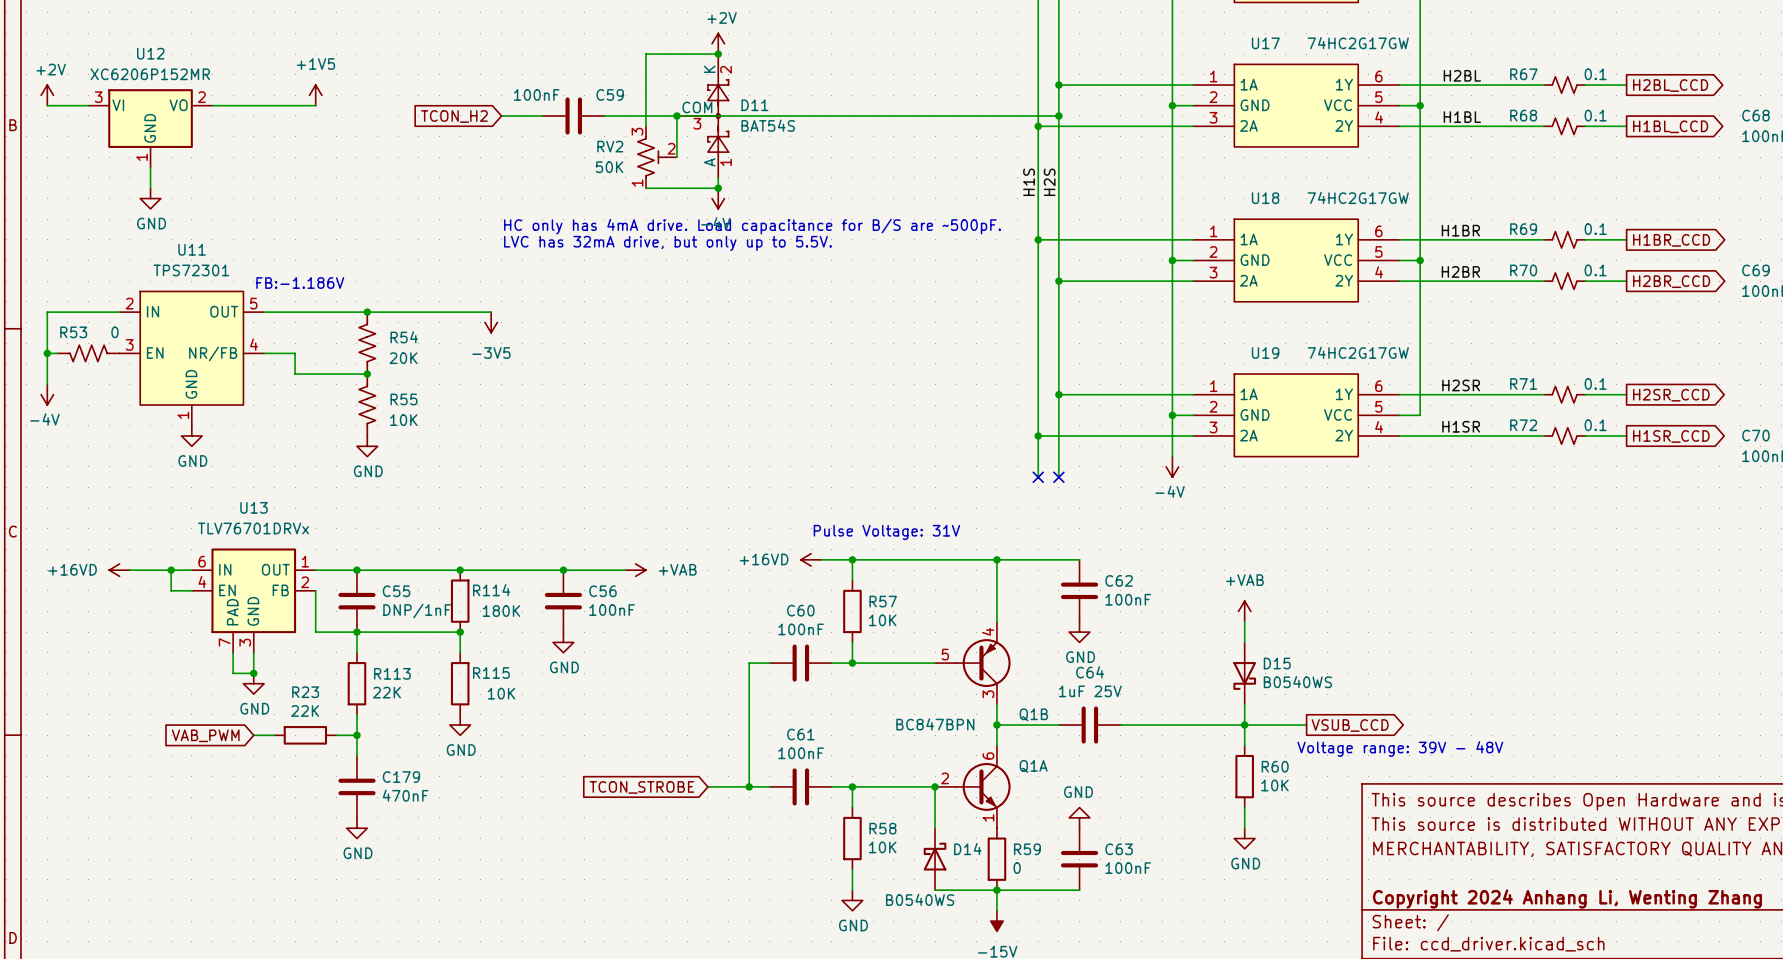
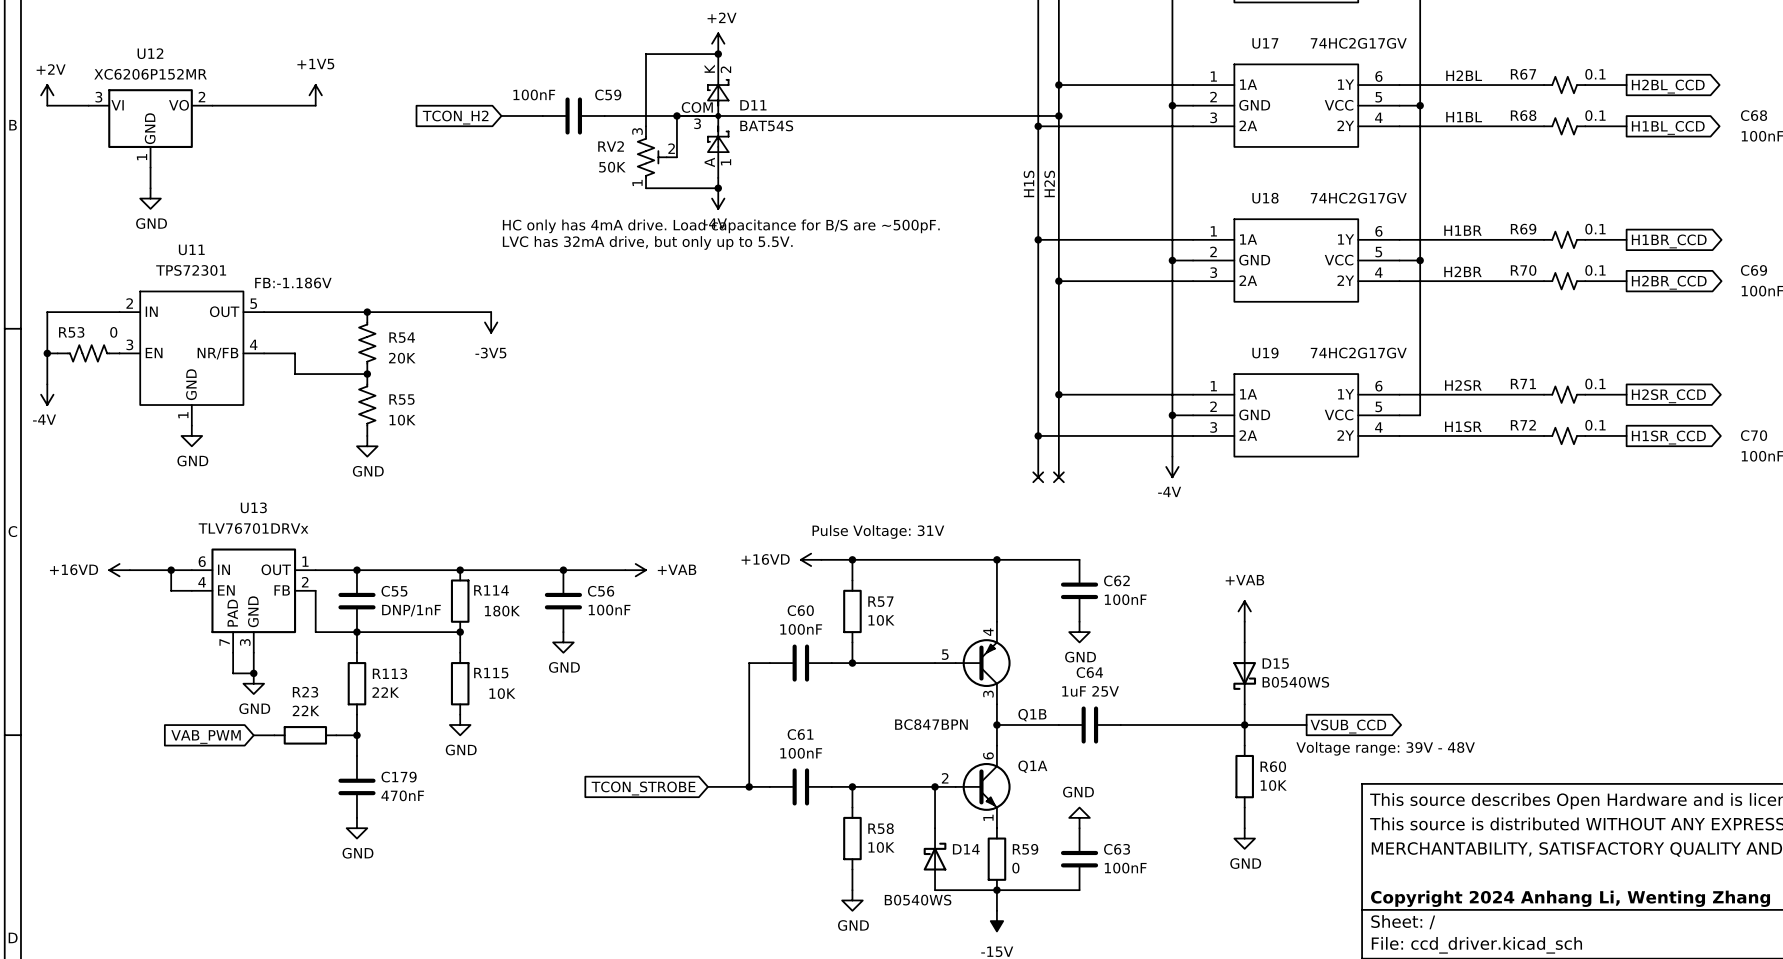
U17 value: 74HC2G17GW (1358, 43) -> 74HC2G17GV (1358, 43)
U18 value: 74HC2G17GW (1358, 197) -> 74HC2G17GV (1358, 198)
U19 value: 74HC2G17GW (1358, 352) -> 74HC2G17GV (1358, 353)

